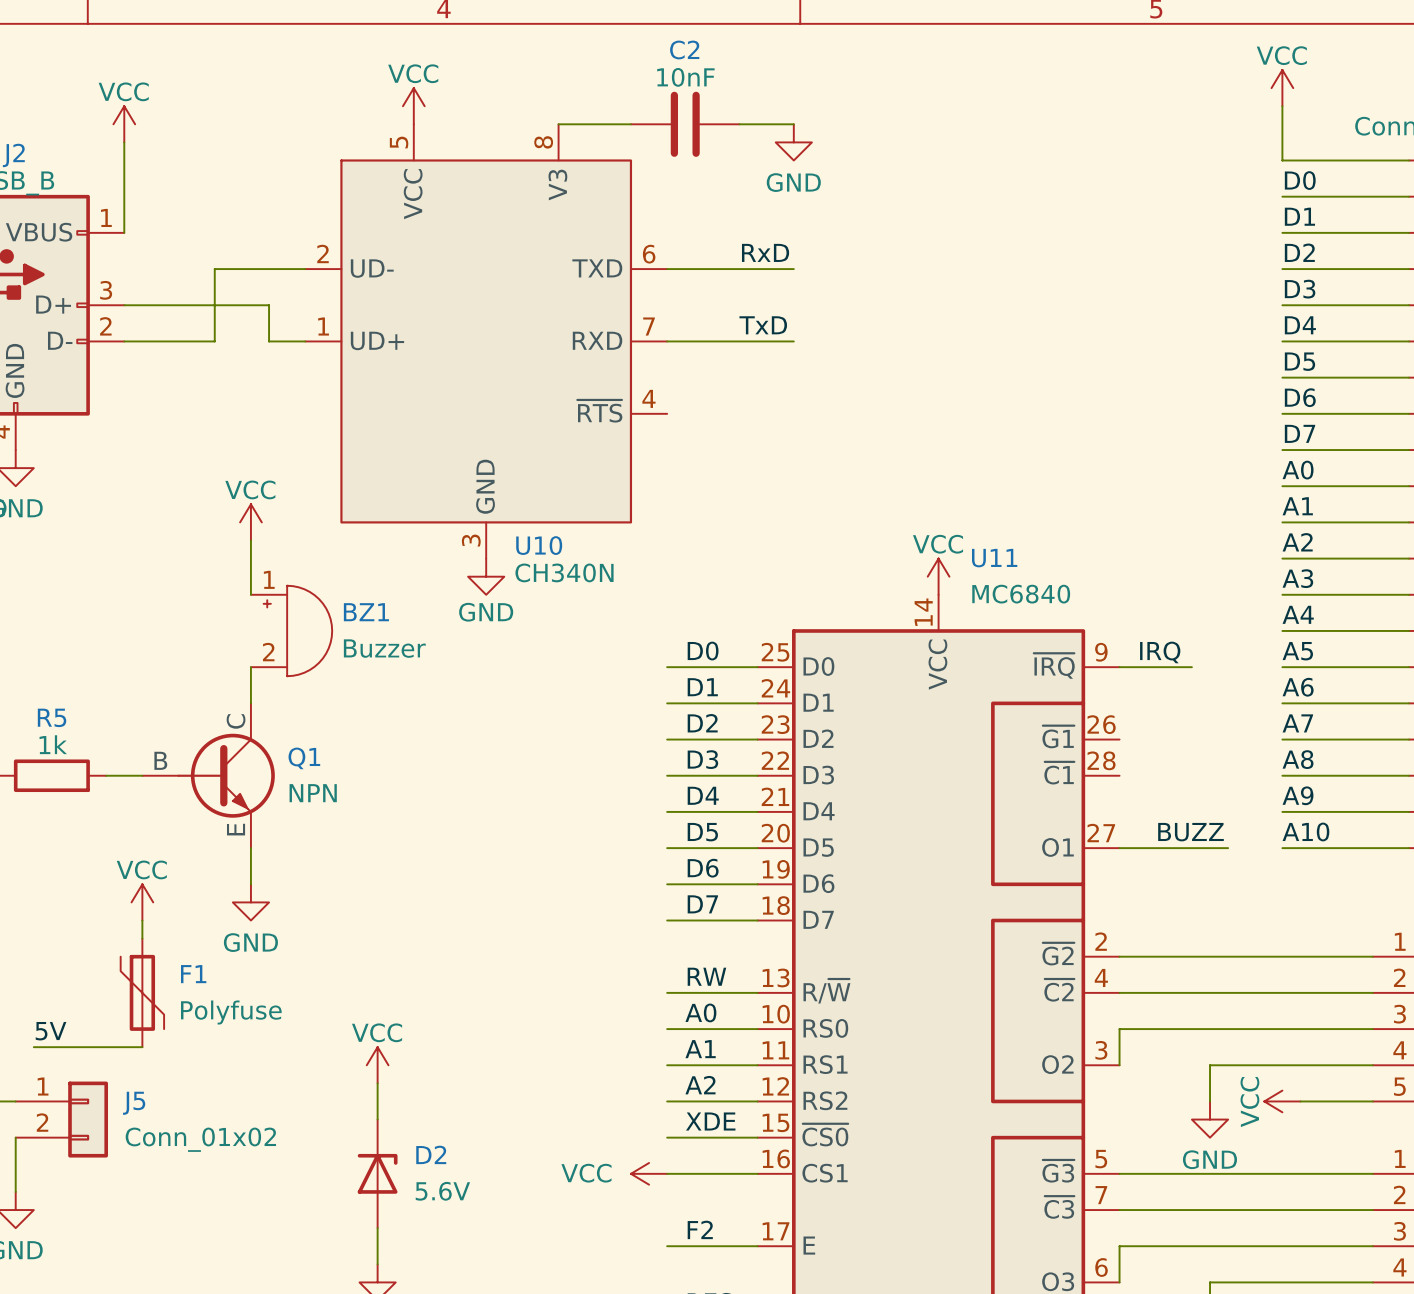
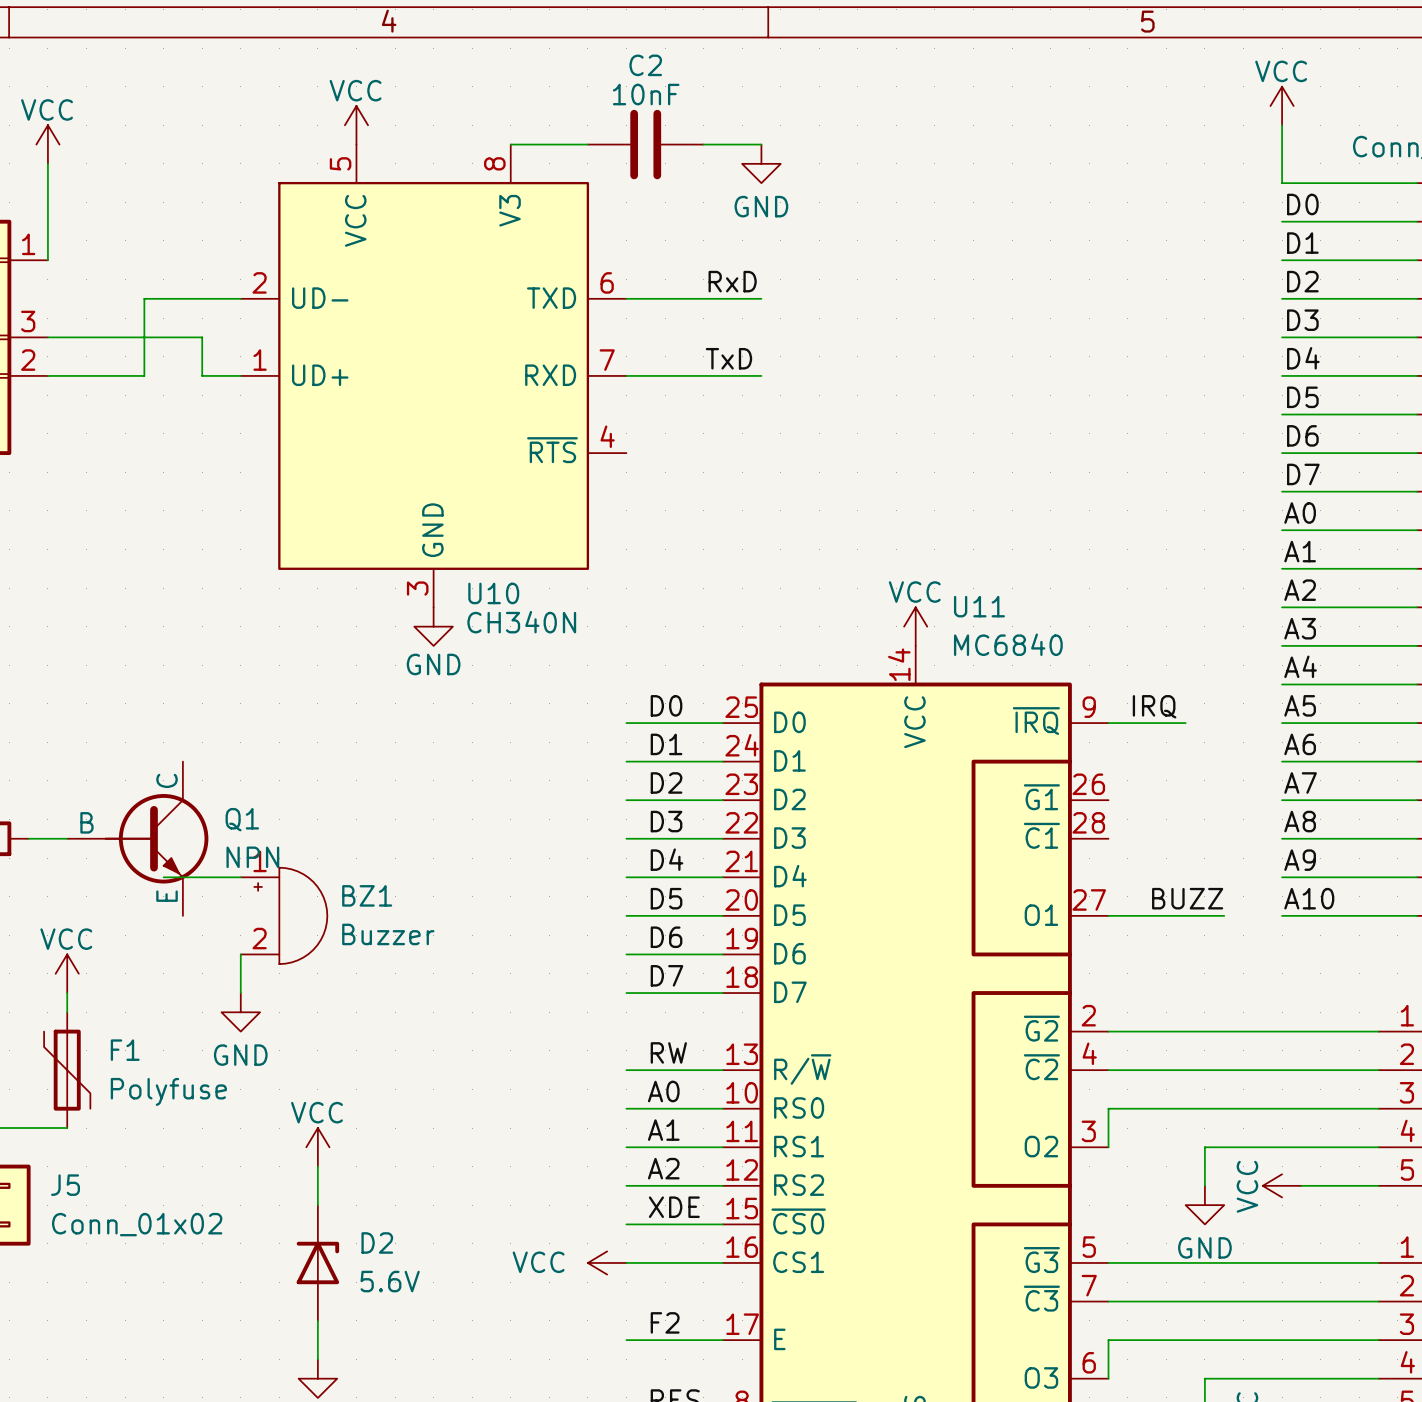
power symbol: VCC (250, 522) -> none
wire: (250, 540) (250, 594) -> none
BZ1 position: (291, 630) -> (284, 915)
wire: (250, 667) (250, 703) -> none
wire: none -> (163, 877) (240, 877)
wire: (250, 848) (250, 884) -> (240, 954) (240, 993)
power symbol position: GND (250, 902) -> GND (240, 1012)

